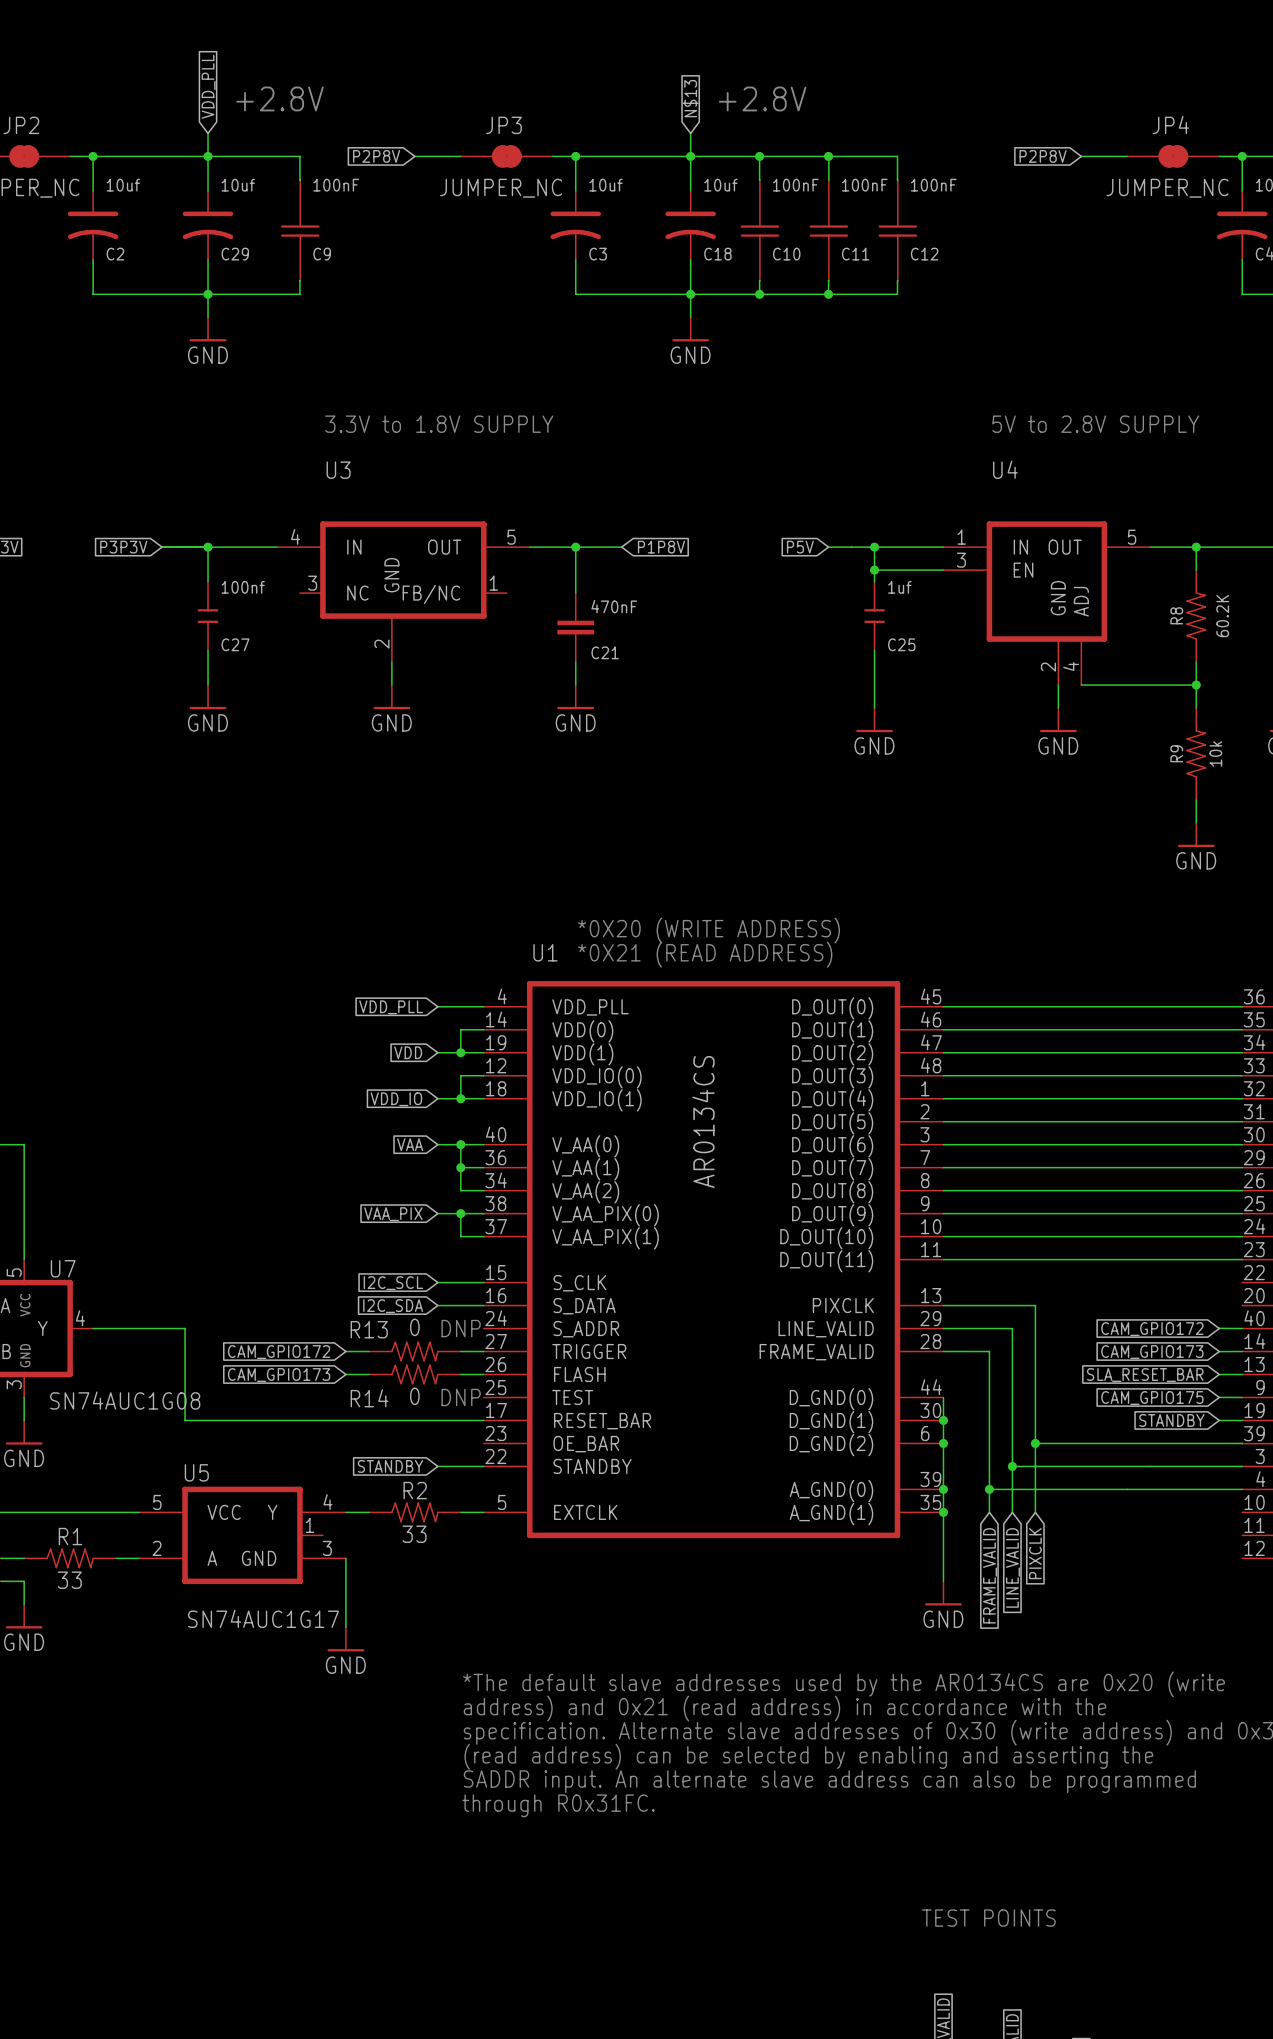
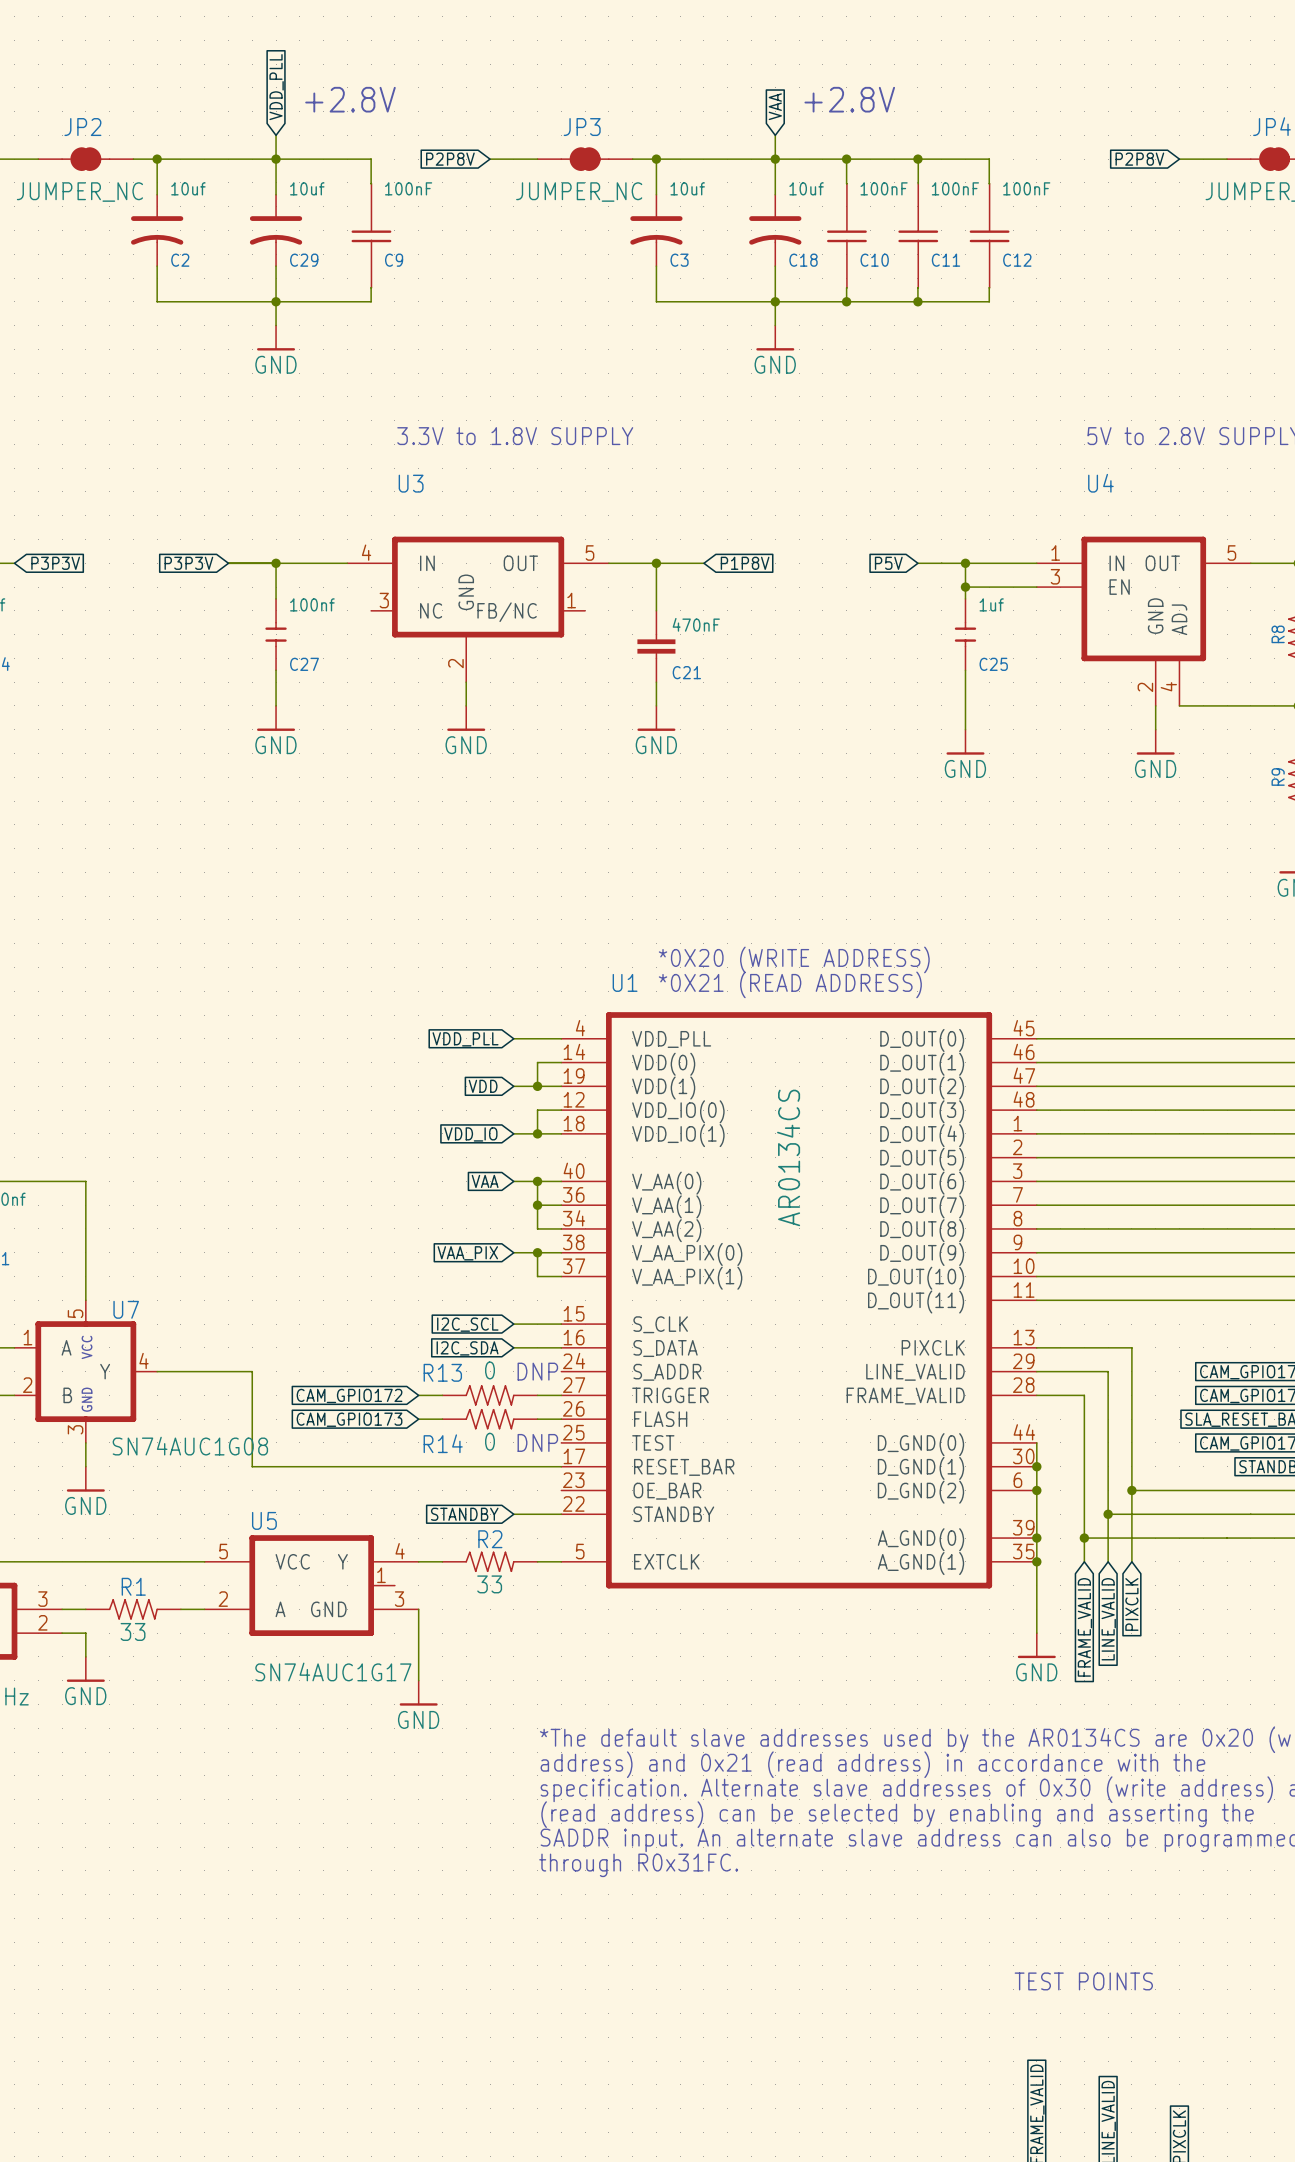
global label: N$13 (690, 98) -> VAA (775, 106)

